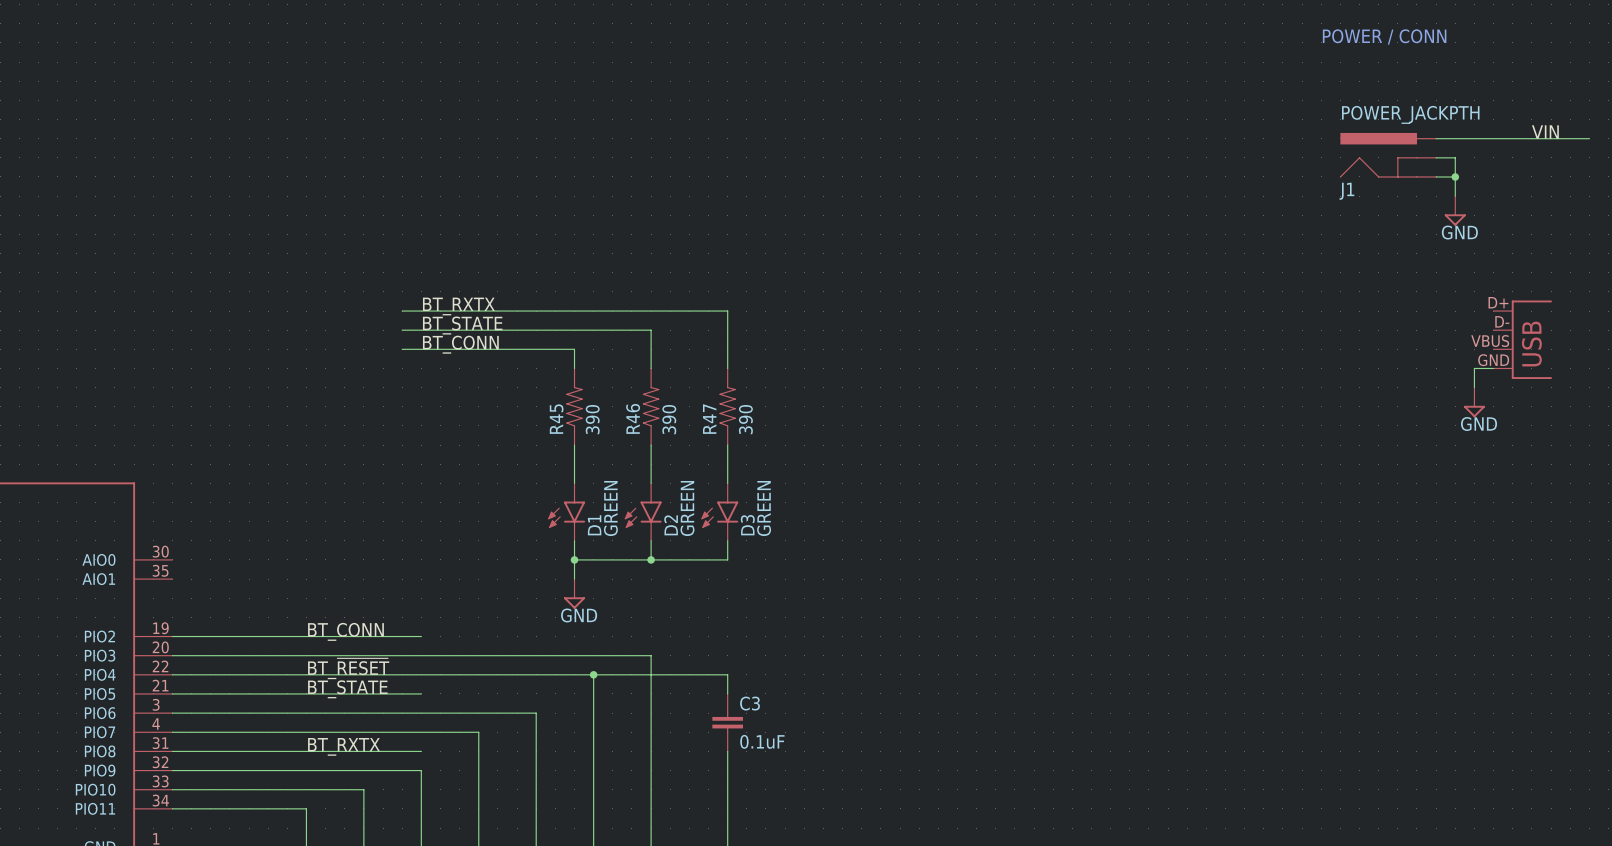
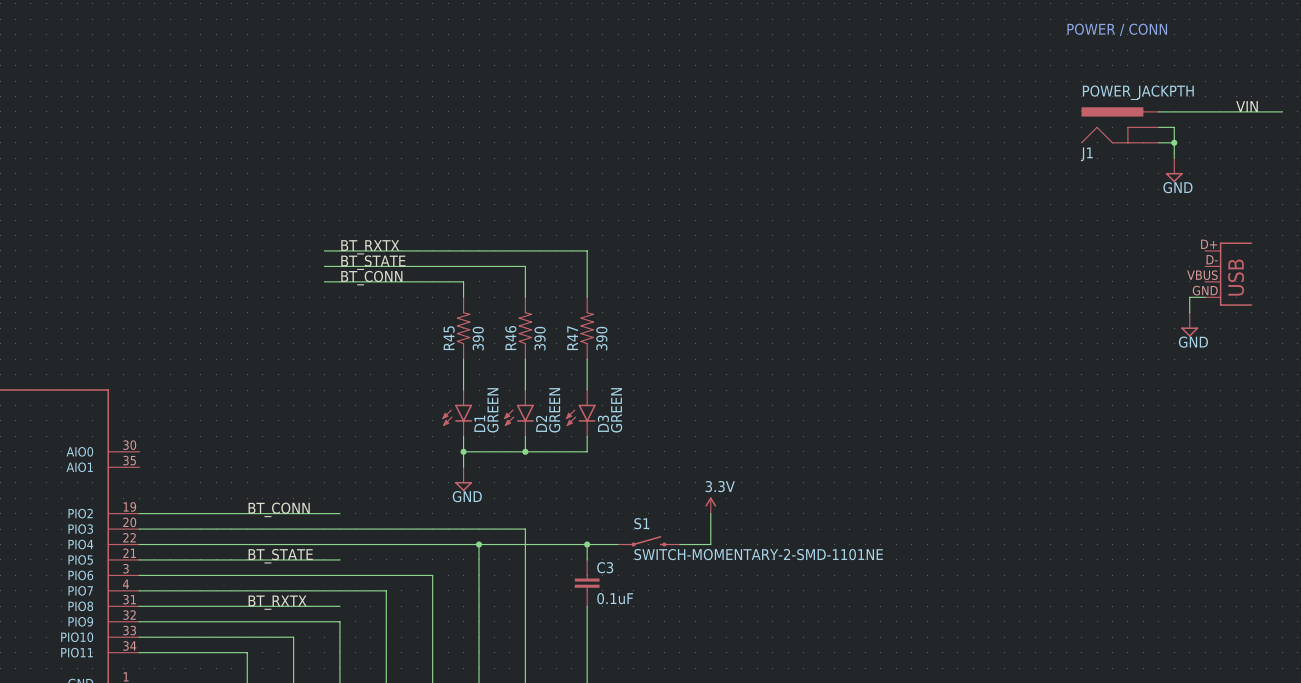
power symbol: none -> 3.3V (710, 505)
wire: none -> (710, 513) (710, 544) (679, 544)
label: BT_~{RESET} (348, 668) -> none
S1: none -> SWITCH-MOMENTARY-2-SMD-1101NE (648, 541)
wire: none -> (587, 544) (618, 544)
junction: none -> (587, 544)

